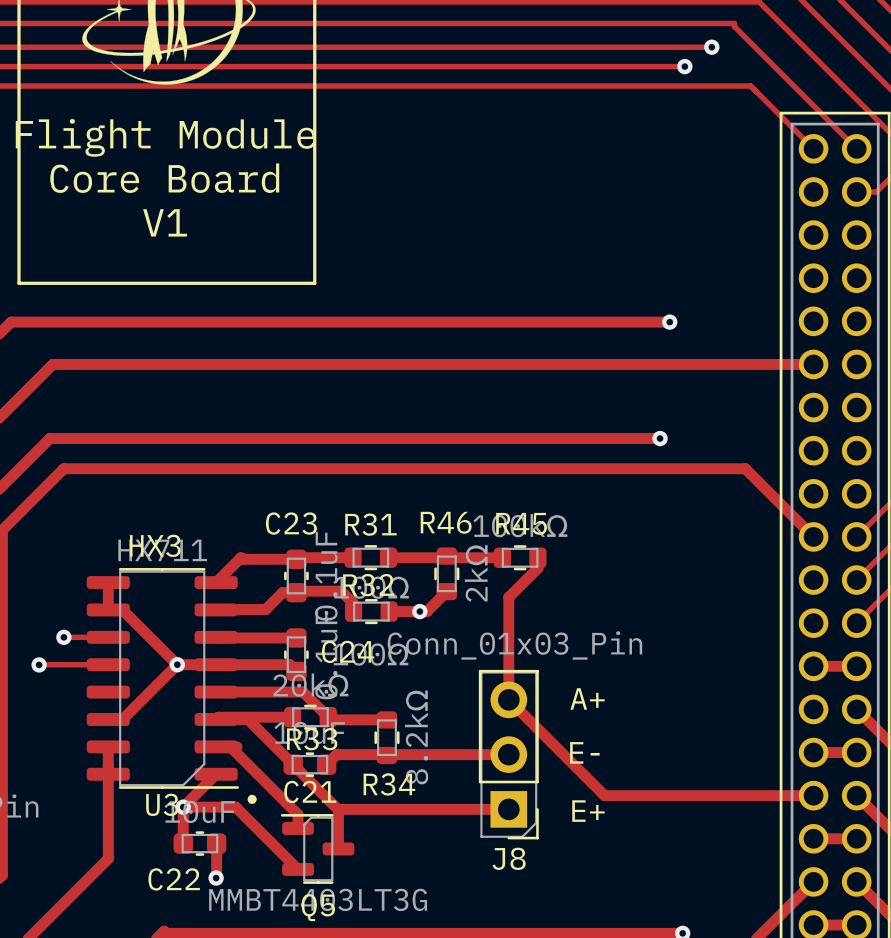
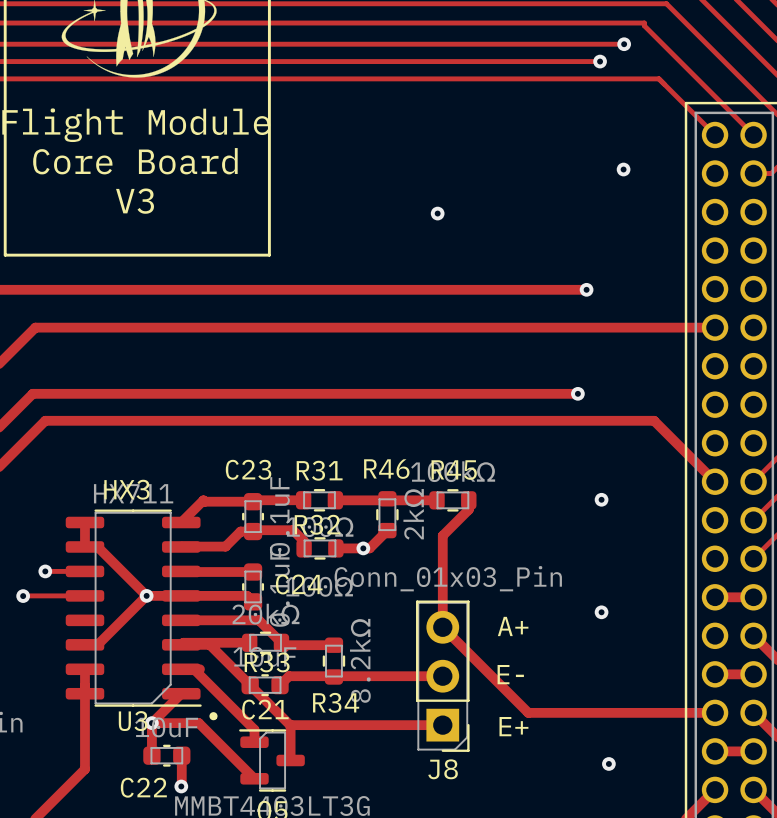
via: none -> (623, 169)
text: V1 (165, 222) -> V3 (135, 201)
via: none -> (437, 213)
via: none -> (601, 499)
via: none -> (601, 612)
via: none -> (608, 763)

